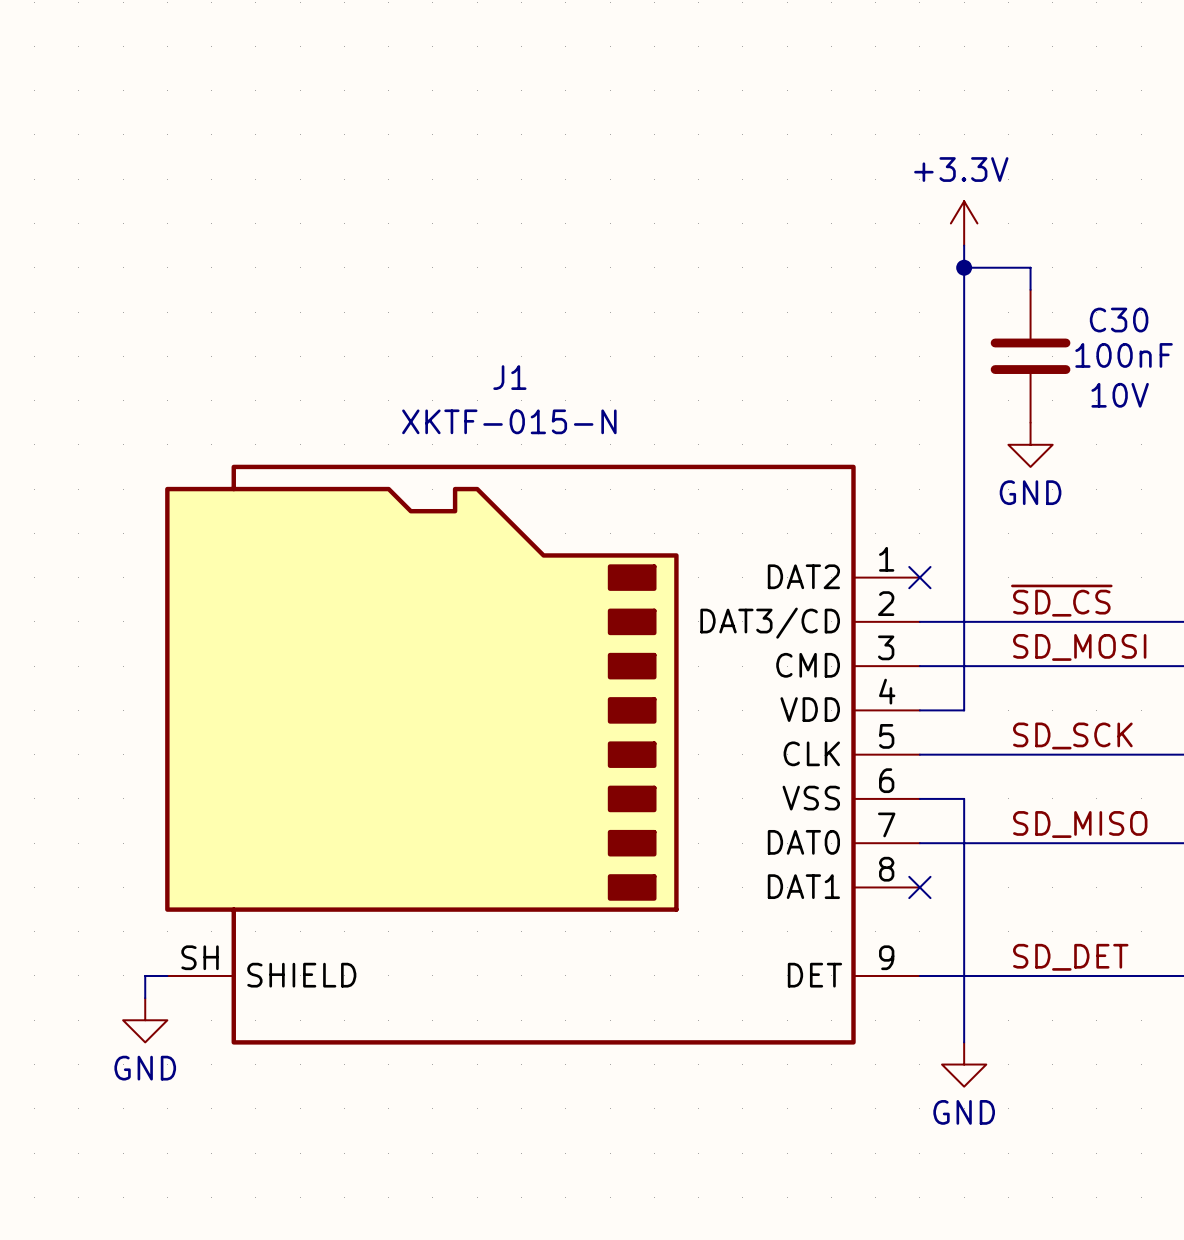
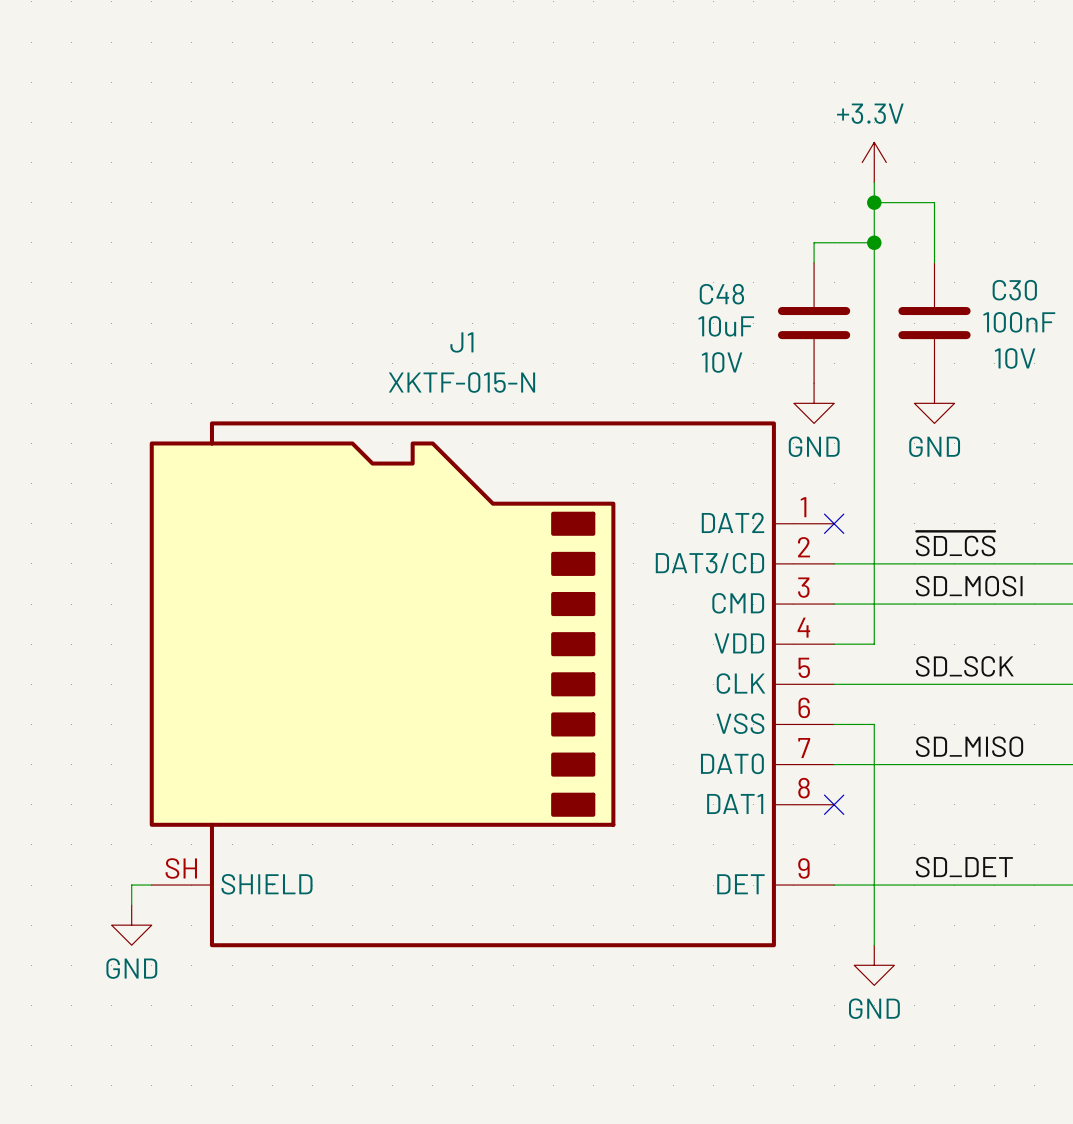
power symbol position: +3.3V (964, 223) -> +3.3V (874, 162)
junction: none -> (874, 202)
wire: (964, 267) (1030, 267) -> (874, 202) (934, 202) (934, 242)
wire: none -> (874, 242) (814, 242) (814, 262)
C48: none -> 10uF (814, 323)
power symbol: none -> GND (814, 403)

